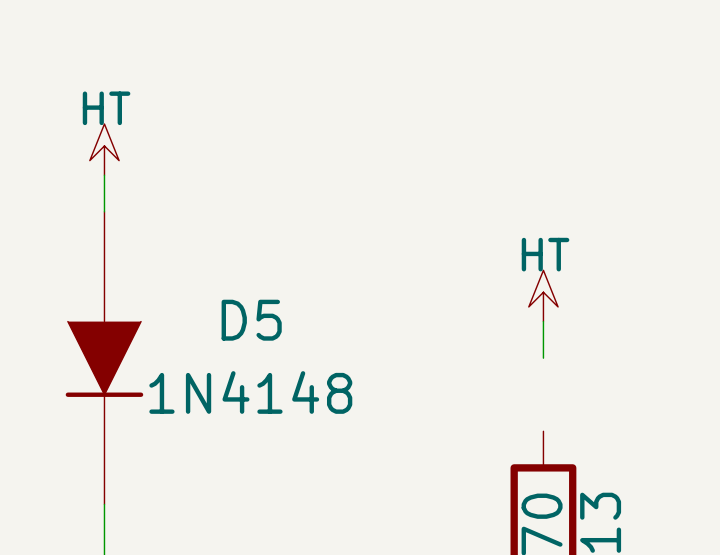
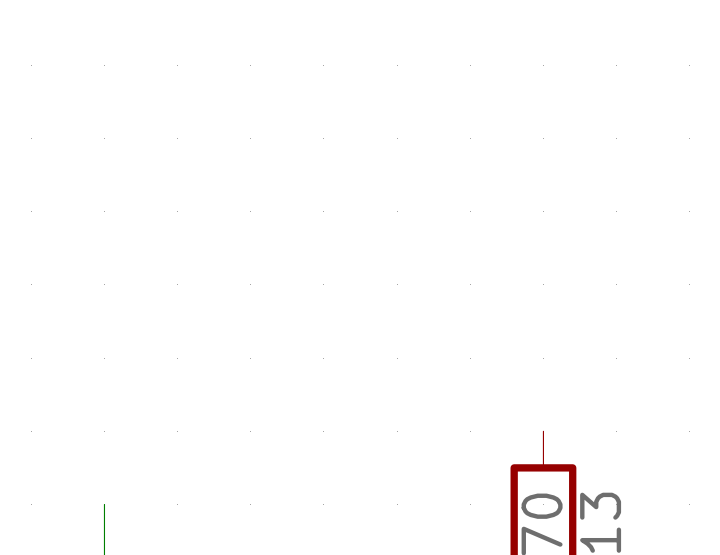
power symbol: HT (104, 149) -> none
wire: (104, 175) (104, 211) -> none
power symbol: HT (543, 295) -> none
wire: (543, 321) (543, 358) -> none
D5: 1N4148 (104, 358) -> none

